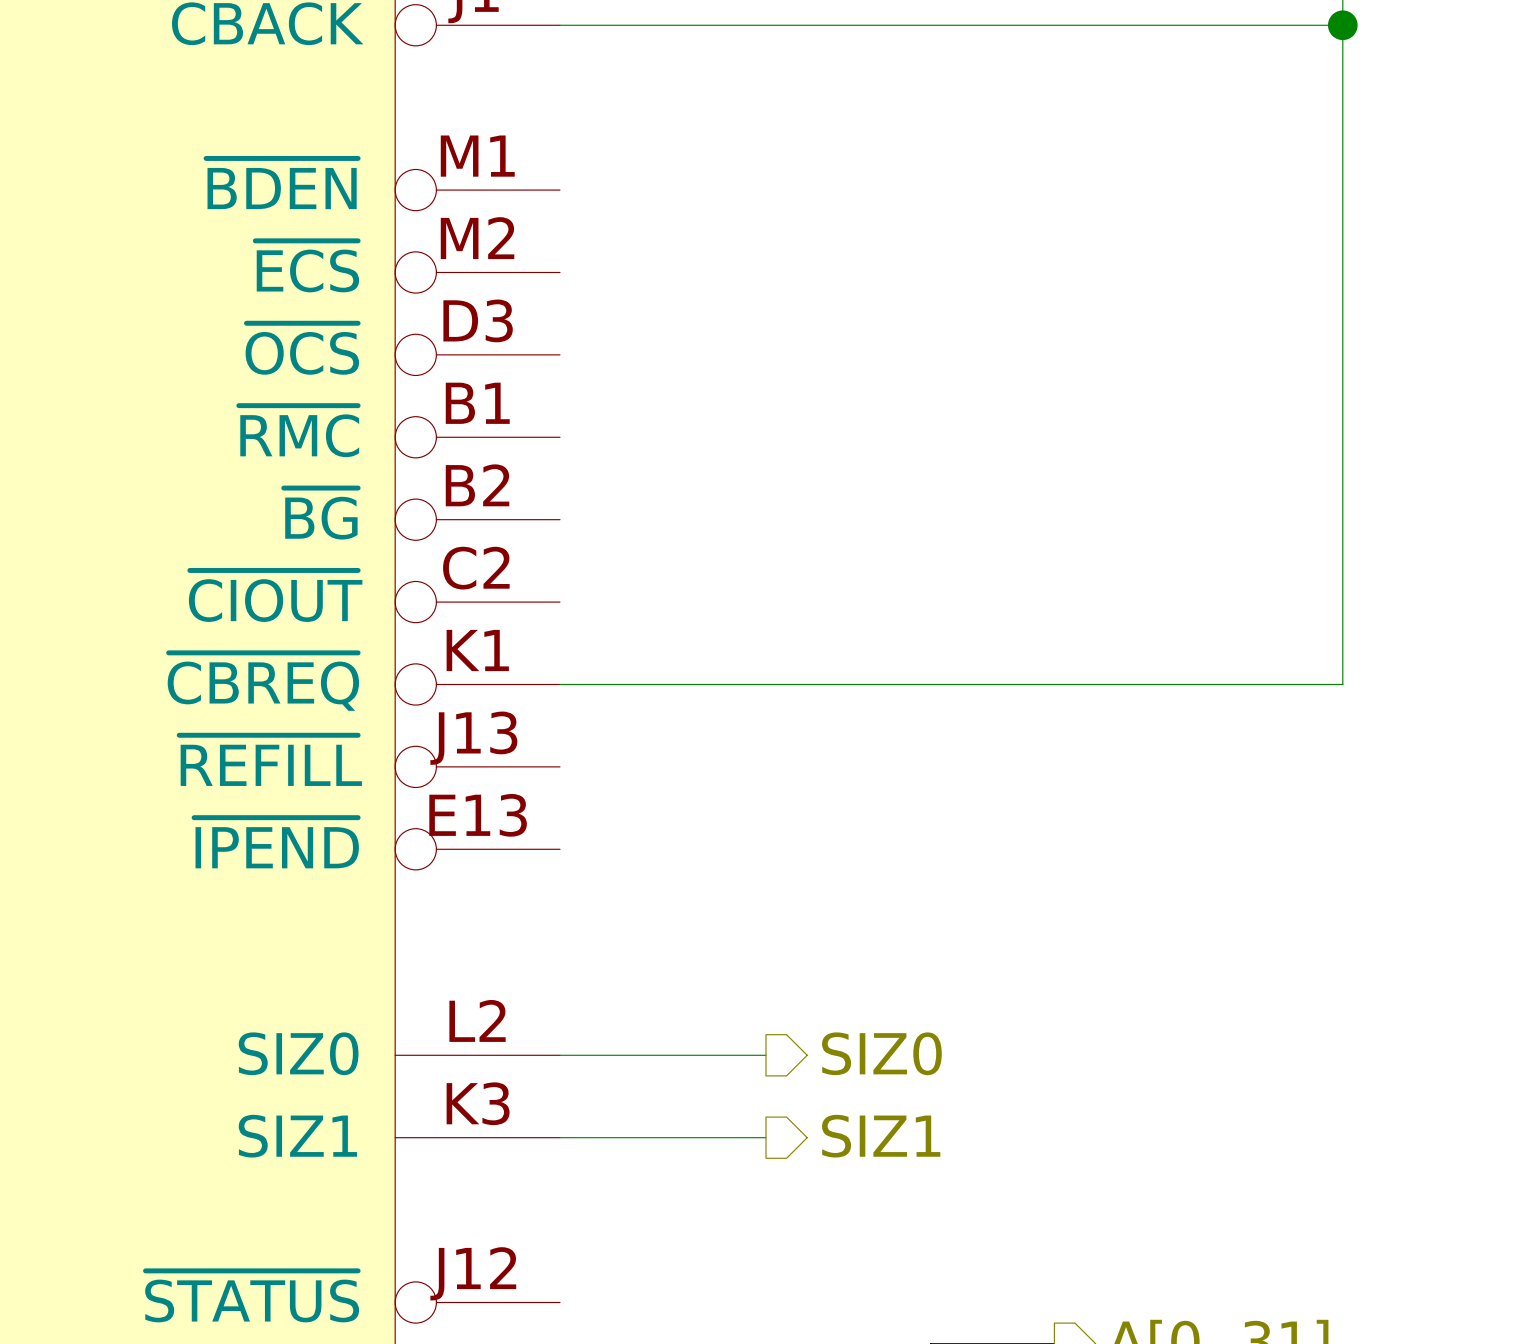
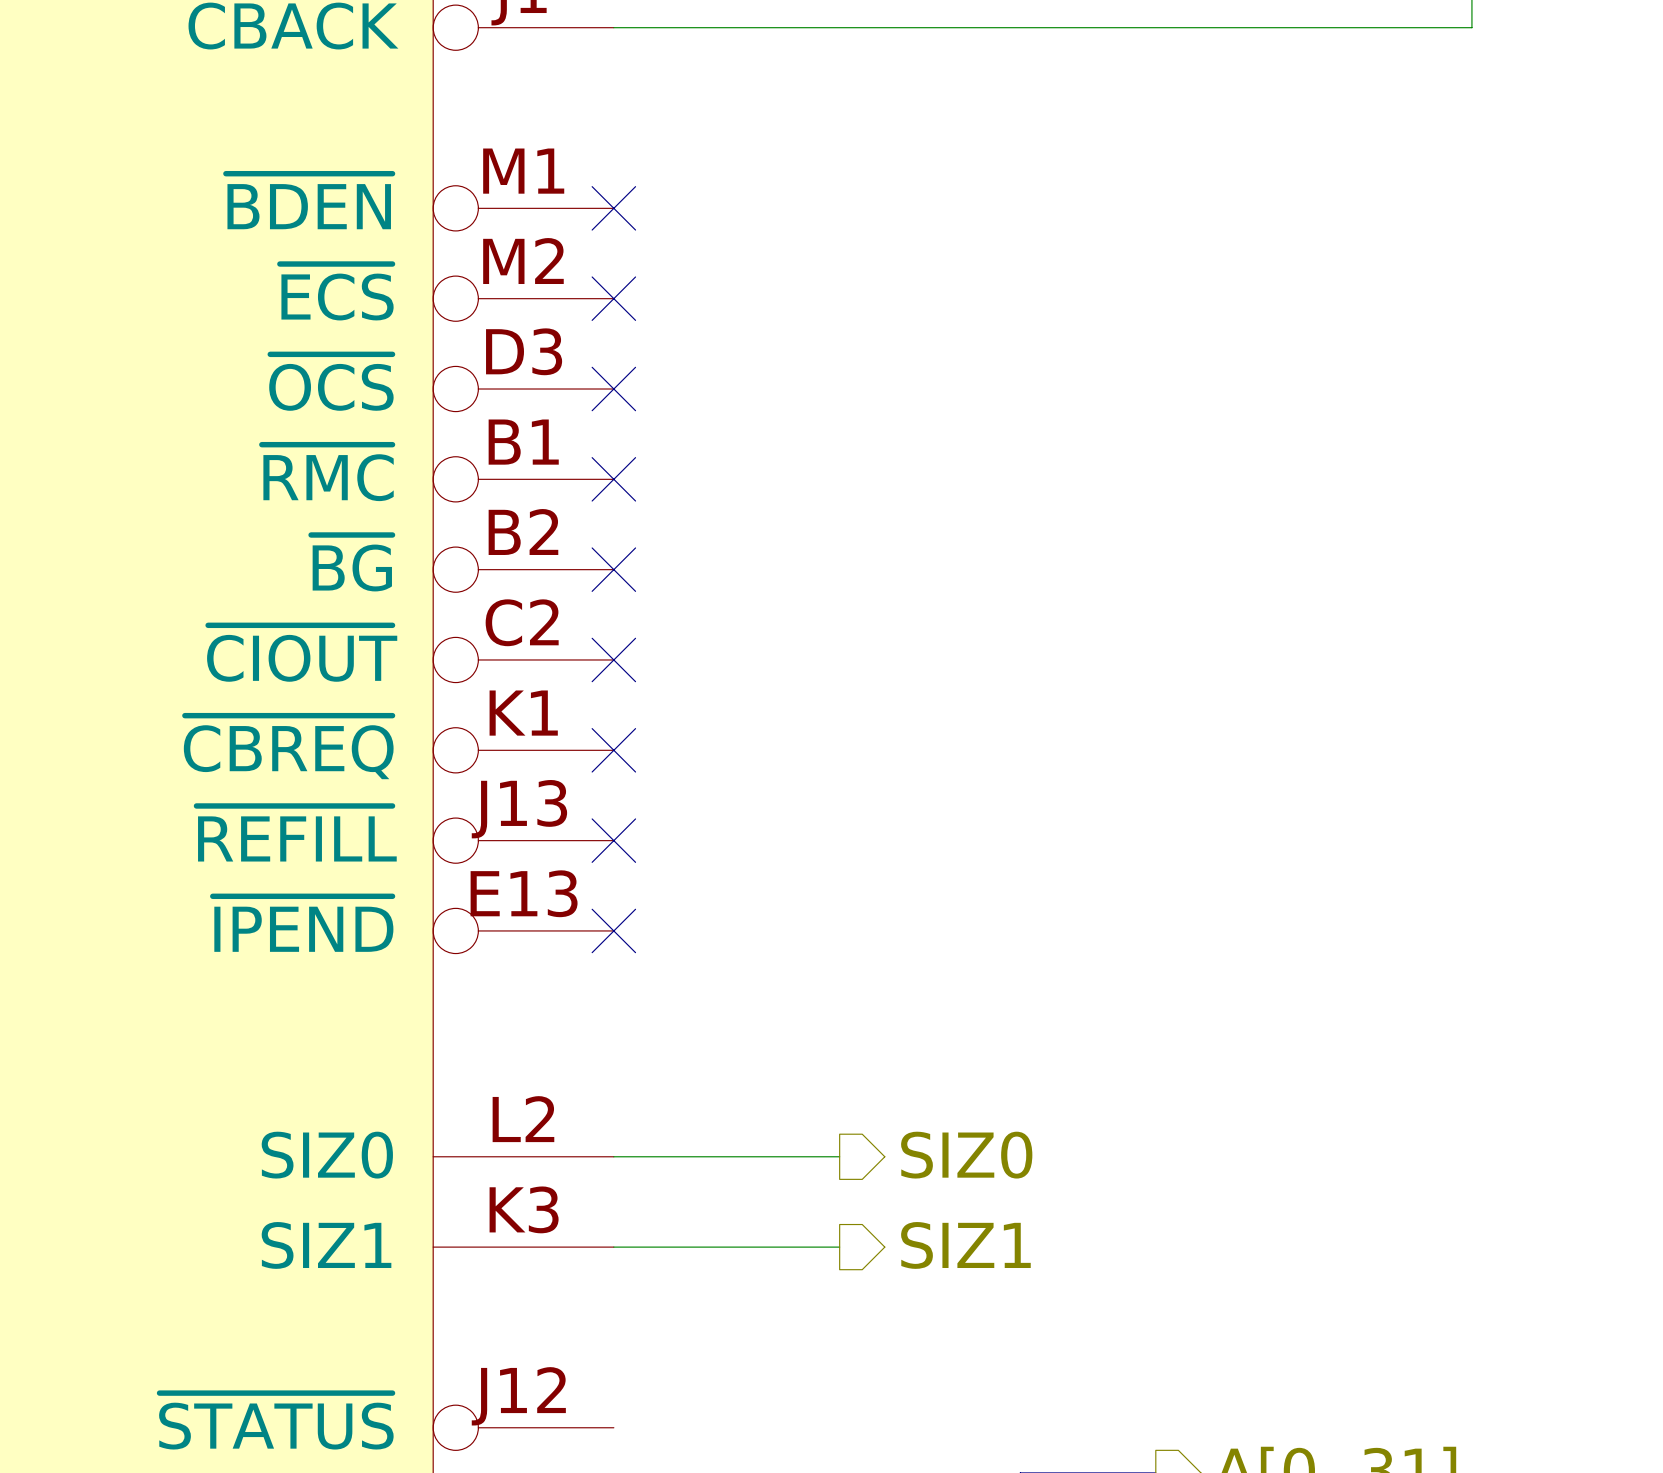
wire: (1342, 25) (1342, 684) (559, 684) -> none
junction: (1342, 25) -> none
no-connect mark: none -> (613, 208)
no-connect mark: none -> (613, 298)
no-connect mark: none -> (613, 389)
no-connect mark: none -> (613, 479)
no-connect mark: none -> (613, 569)
no-connect mark: none -> (613, 659)
no-connect mark: none -> (613, 750)
no-connect mark: none -> (613, 840)
no-connect mark: none -> (613, 930)

